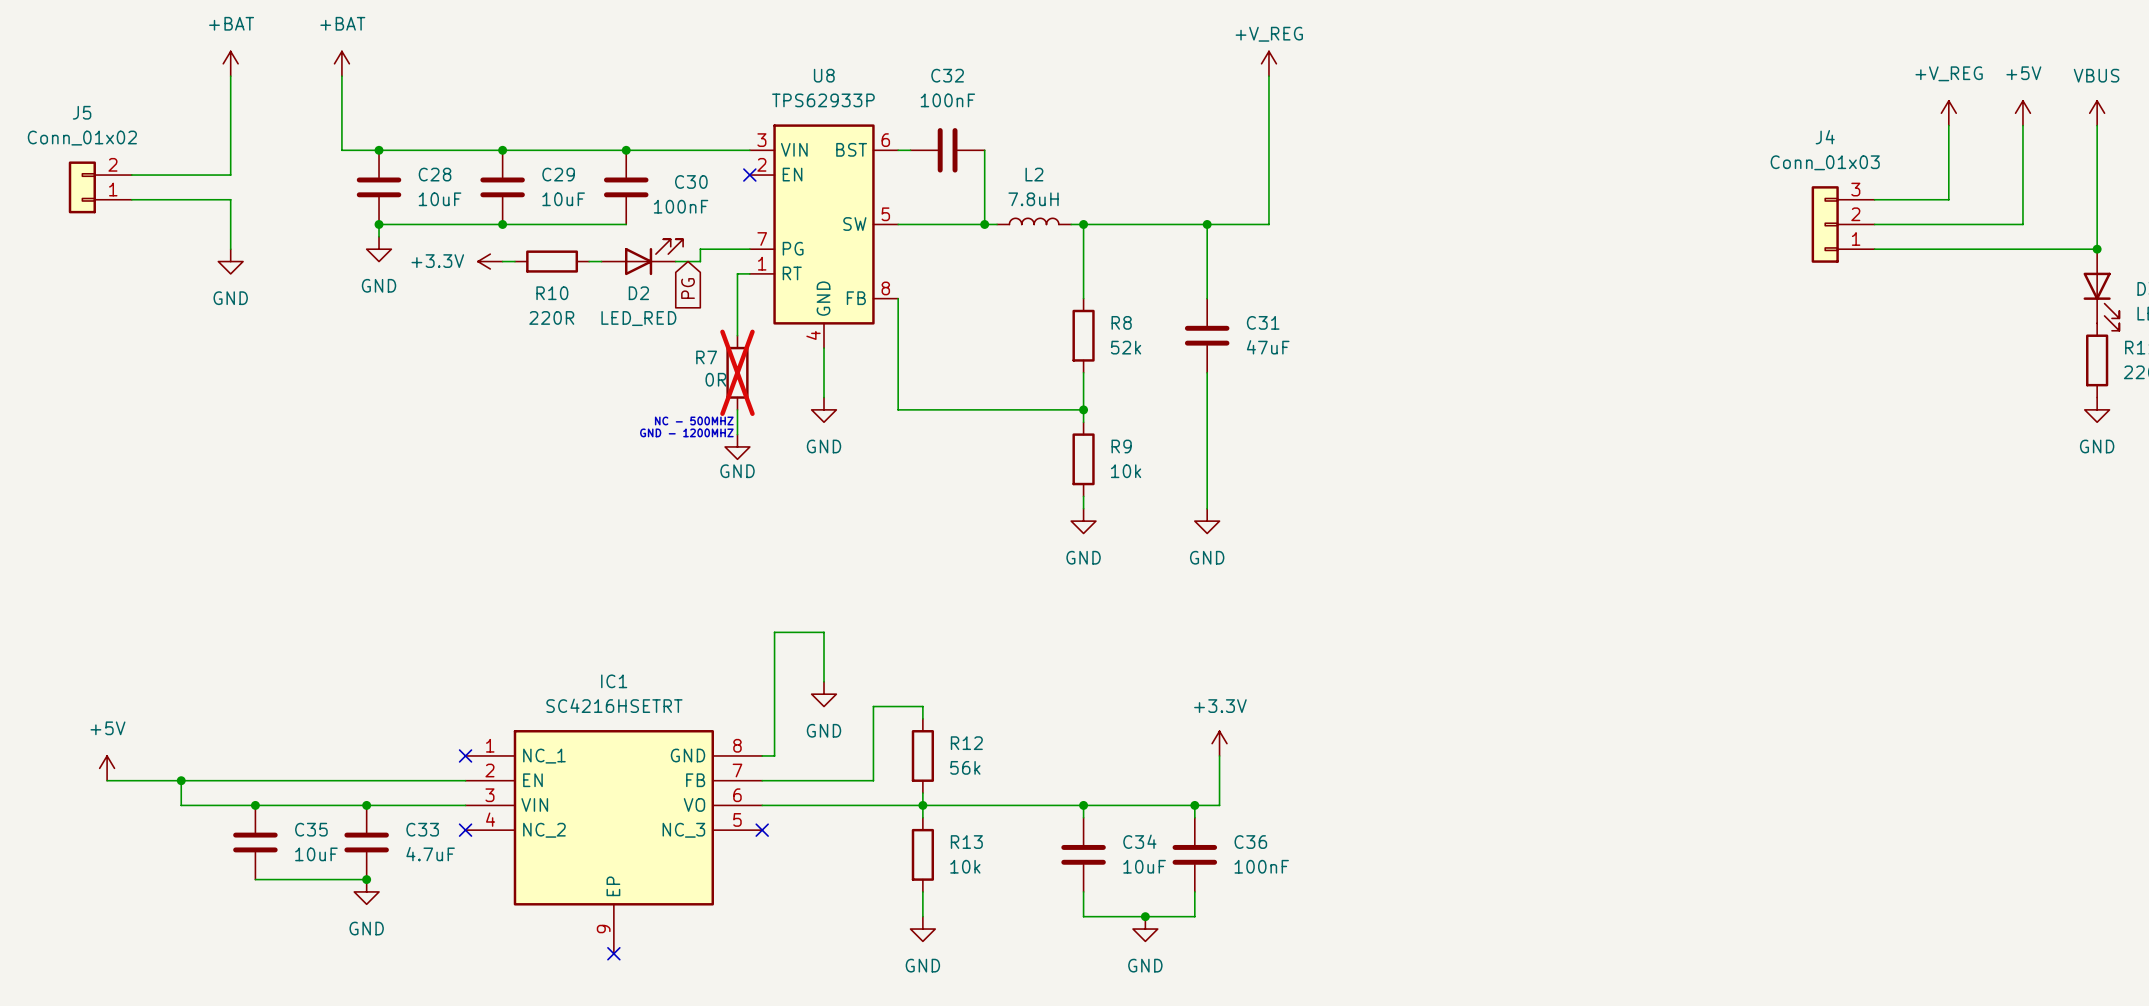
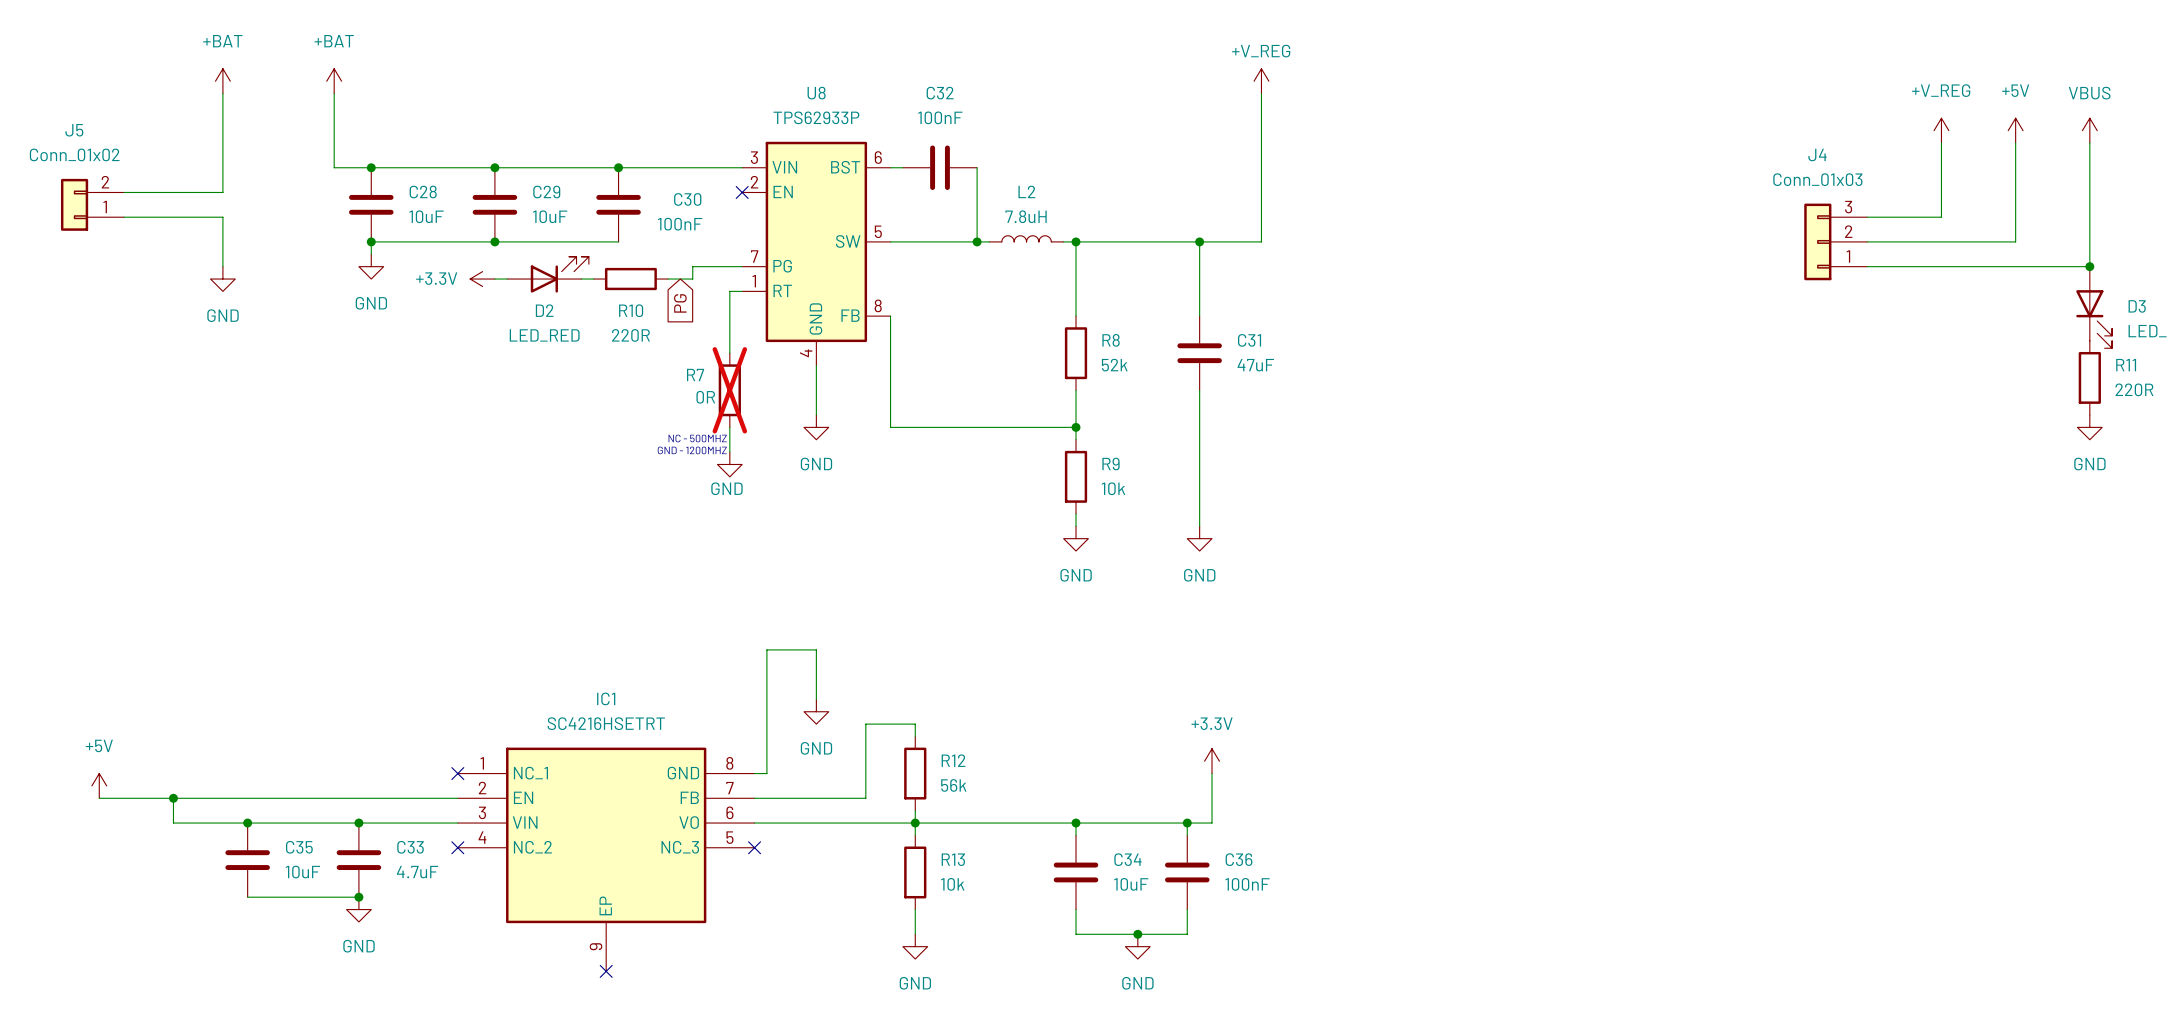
D2 position: (642, 257) -> (548, 274)
R10 position: (552, 261) -> (630, 279)

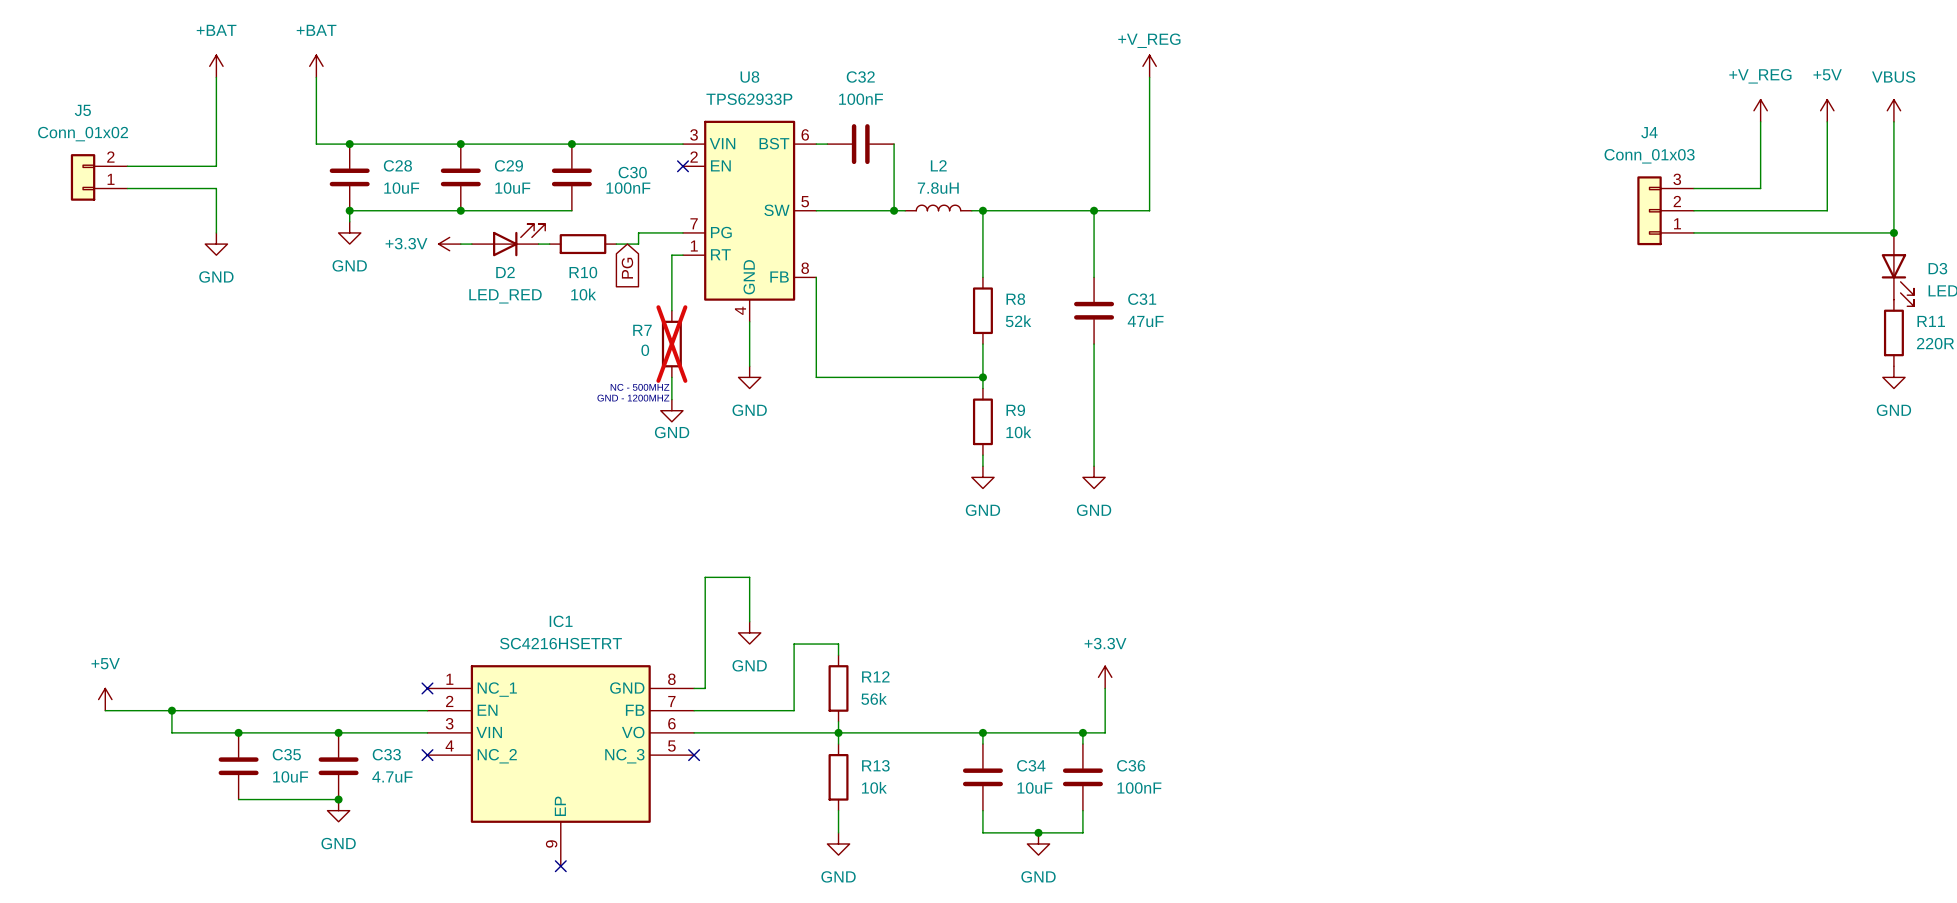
C30 value position: 100nF (680, 224) -> 100nF (628, 188)
R10 value: 220R (630, 335) -> 10k (583, 294)
R7 value: 0R (705, 397) -> 0 (645, 350)

